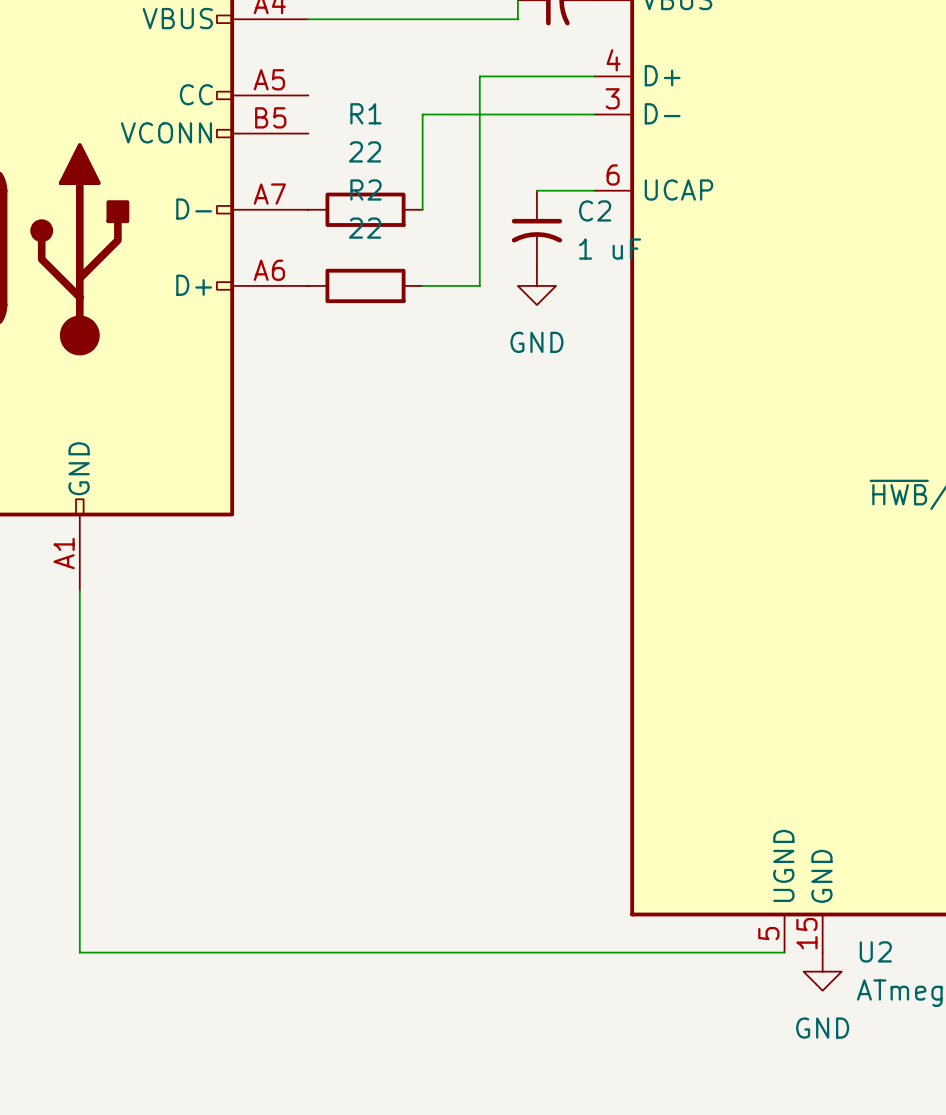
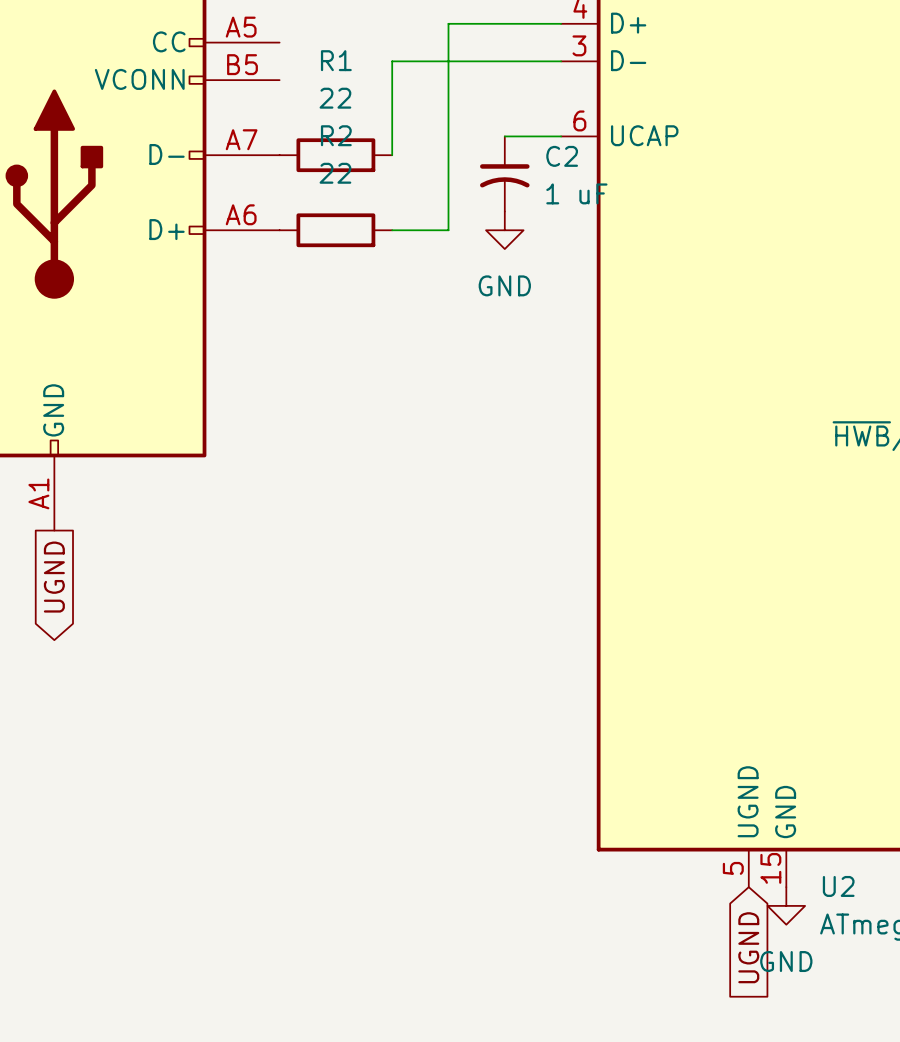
wire: (79, 590) (79, 952) (784, 952) -> none
global label: none -> UGND (54, 577)
global label: none -> UGND (748, 947)

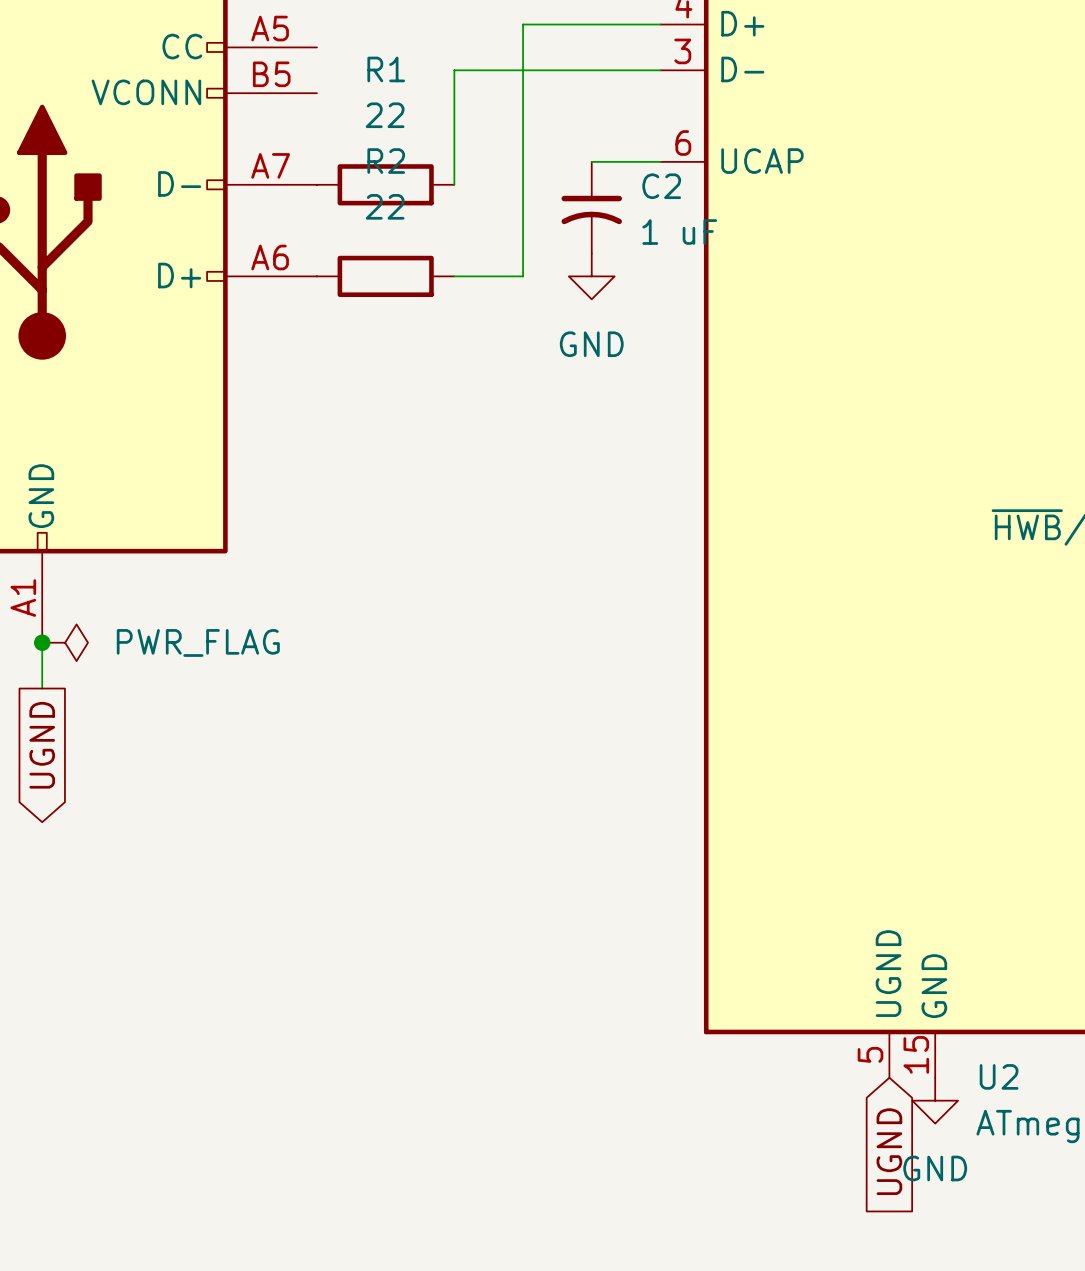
wire: none -> (42, 642) (42, 688)
junction: none -> (42, 642)
power symbol: none -> PWR_FLAG (65, 642)
global label position: UGND (54, 577) -> UGND (42, 745)

